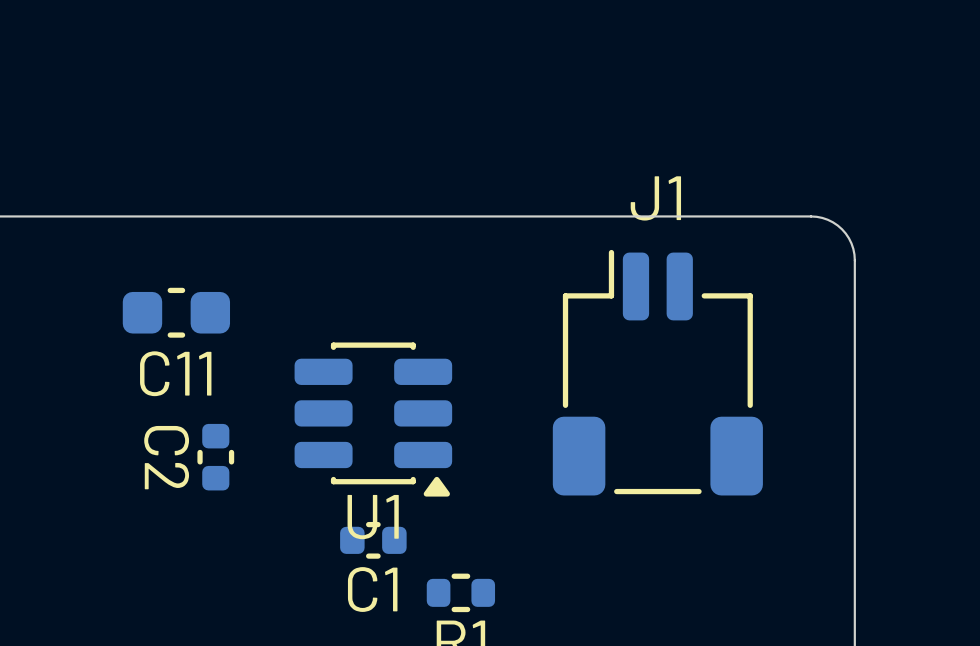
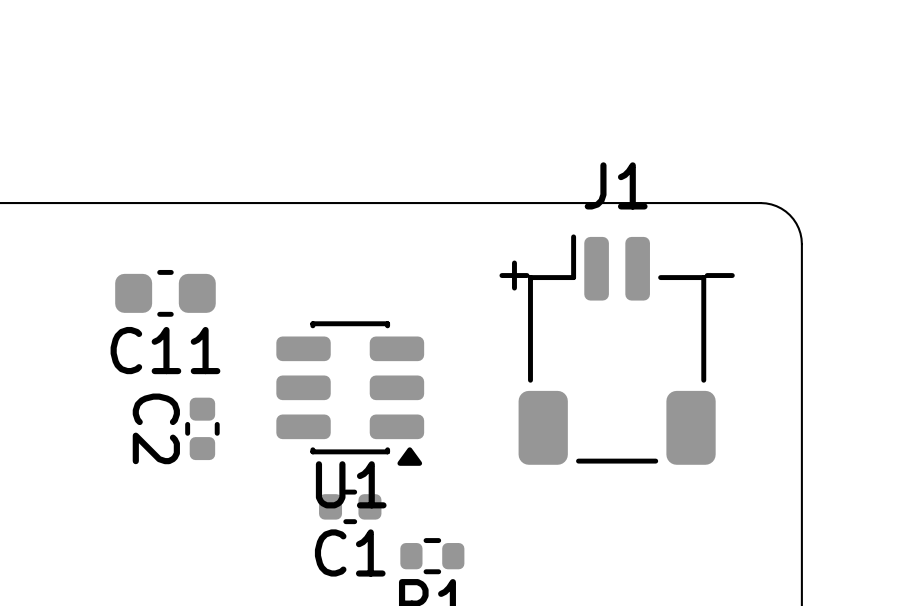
text: none -> + (514, 275)
text: none -> - (719, 275)

